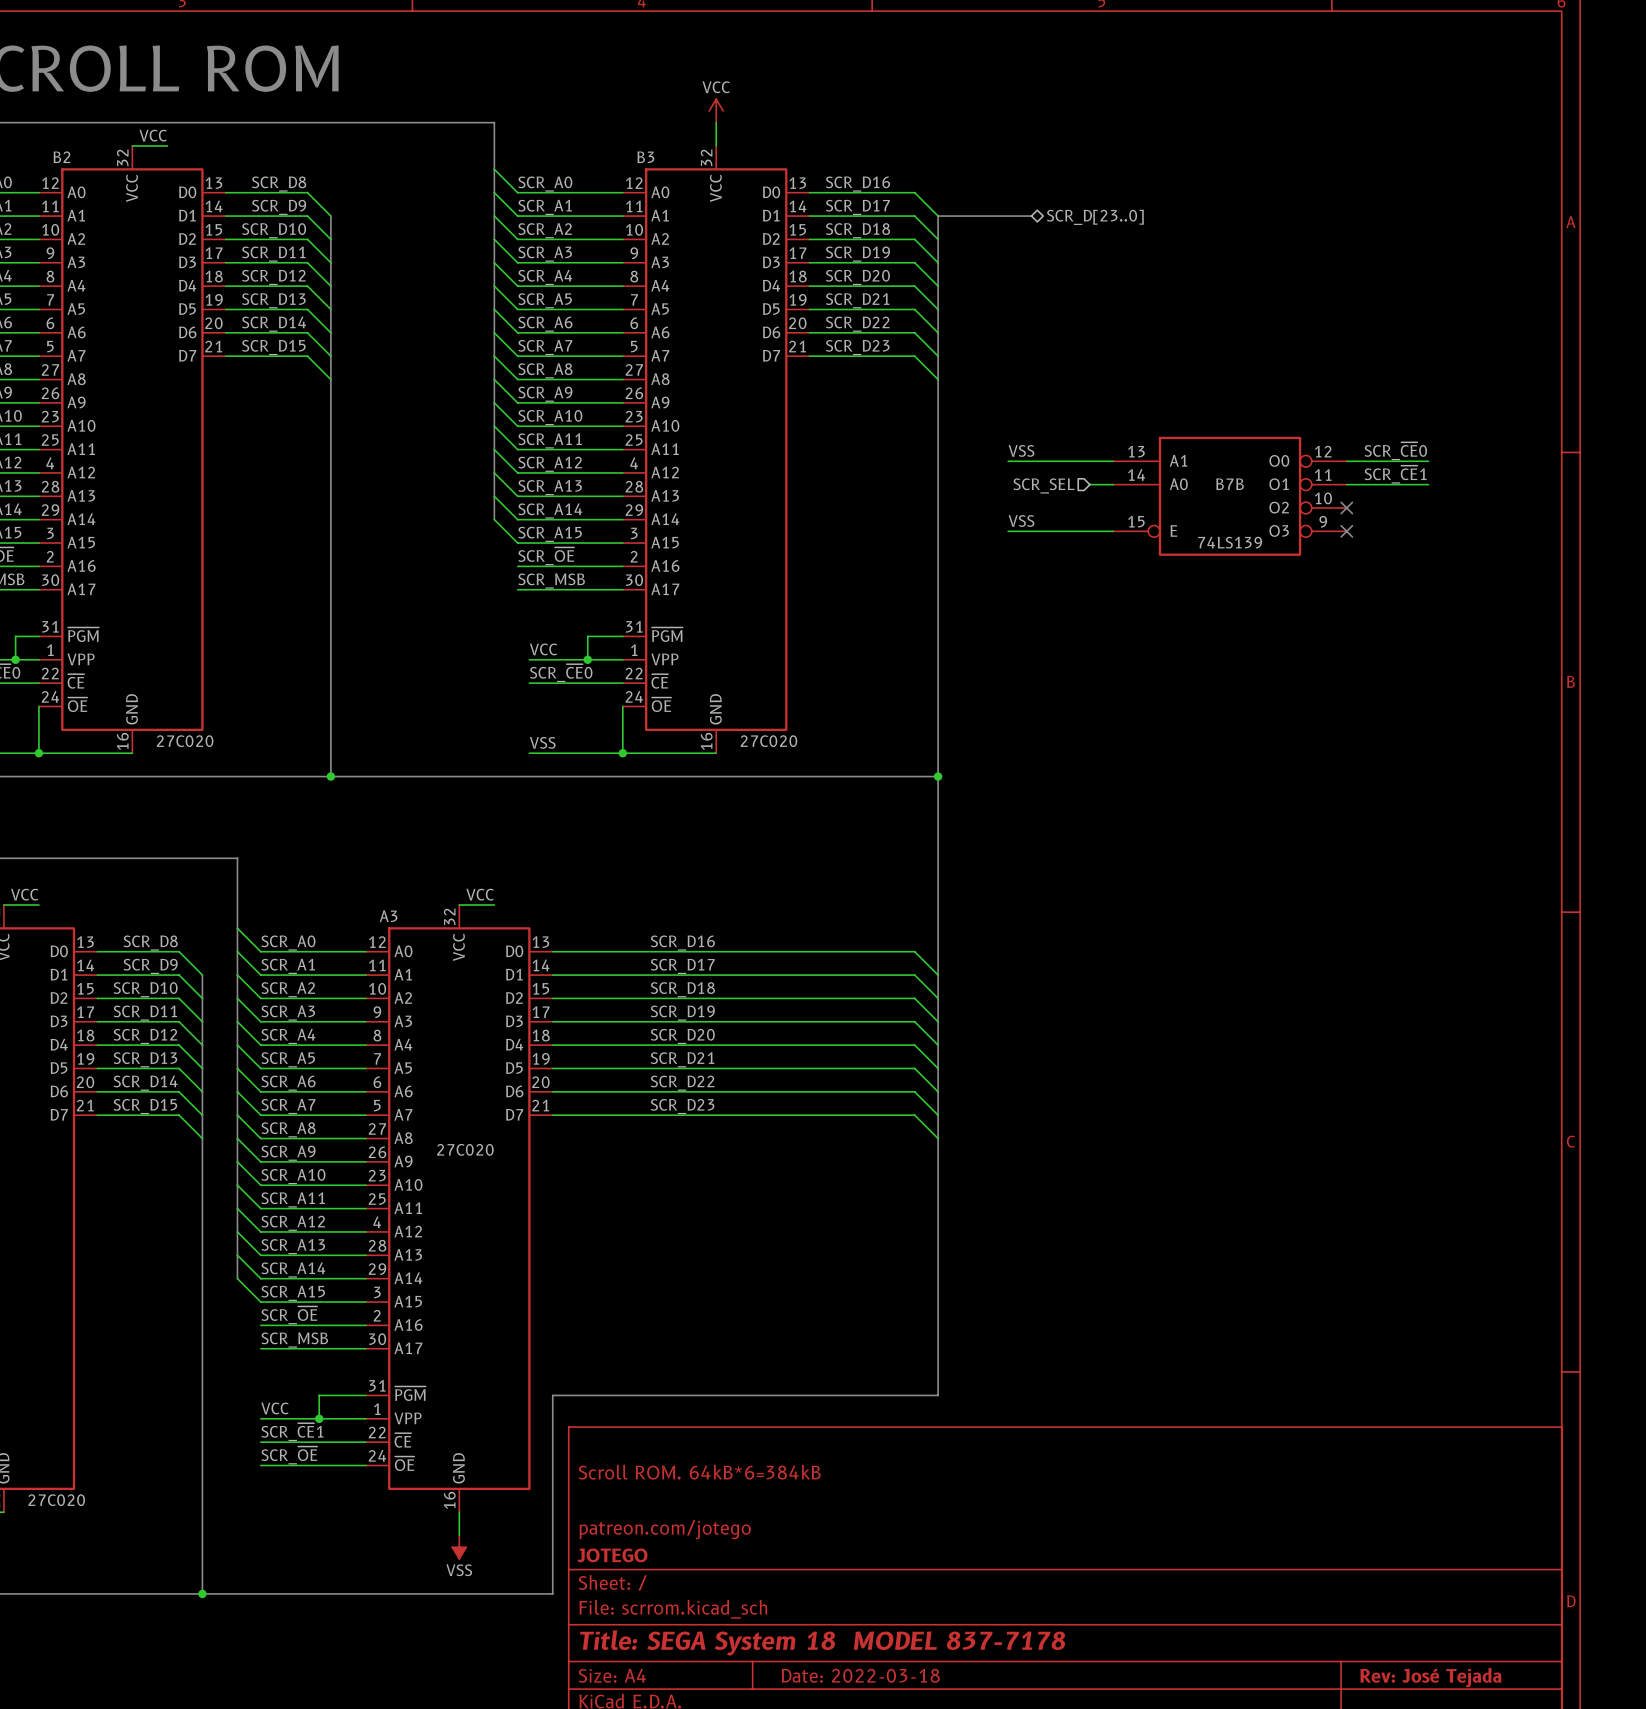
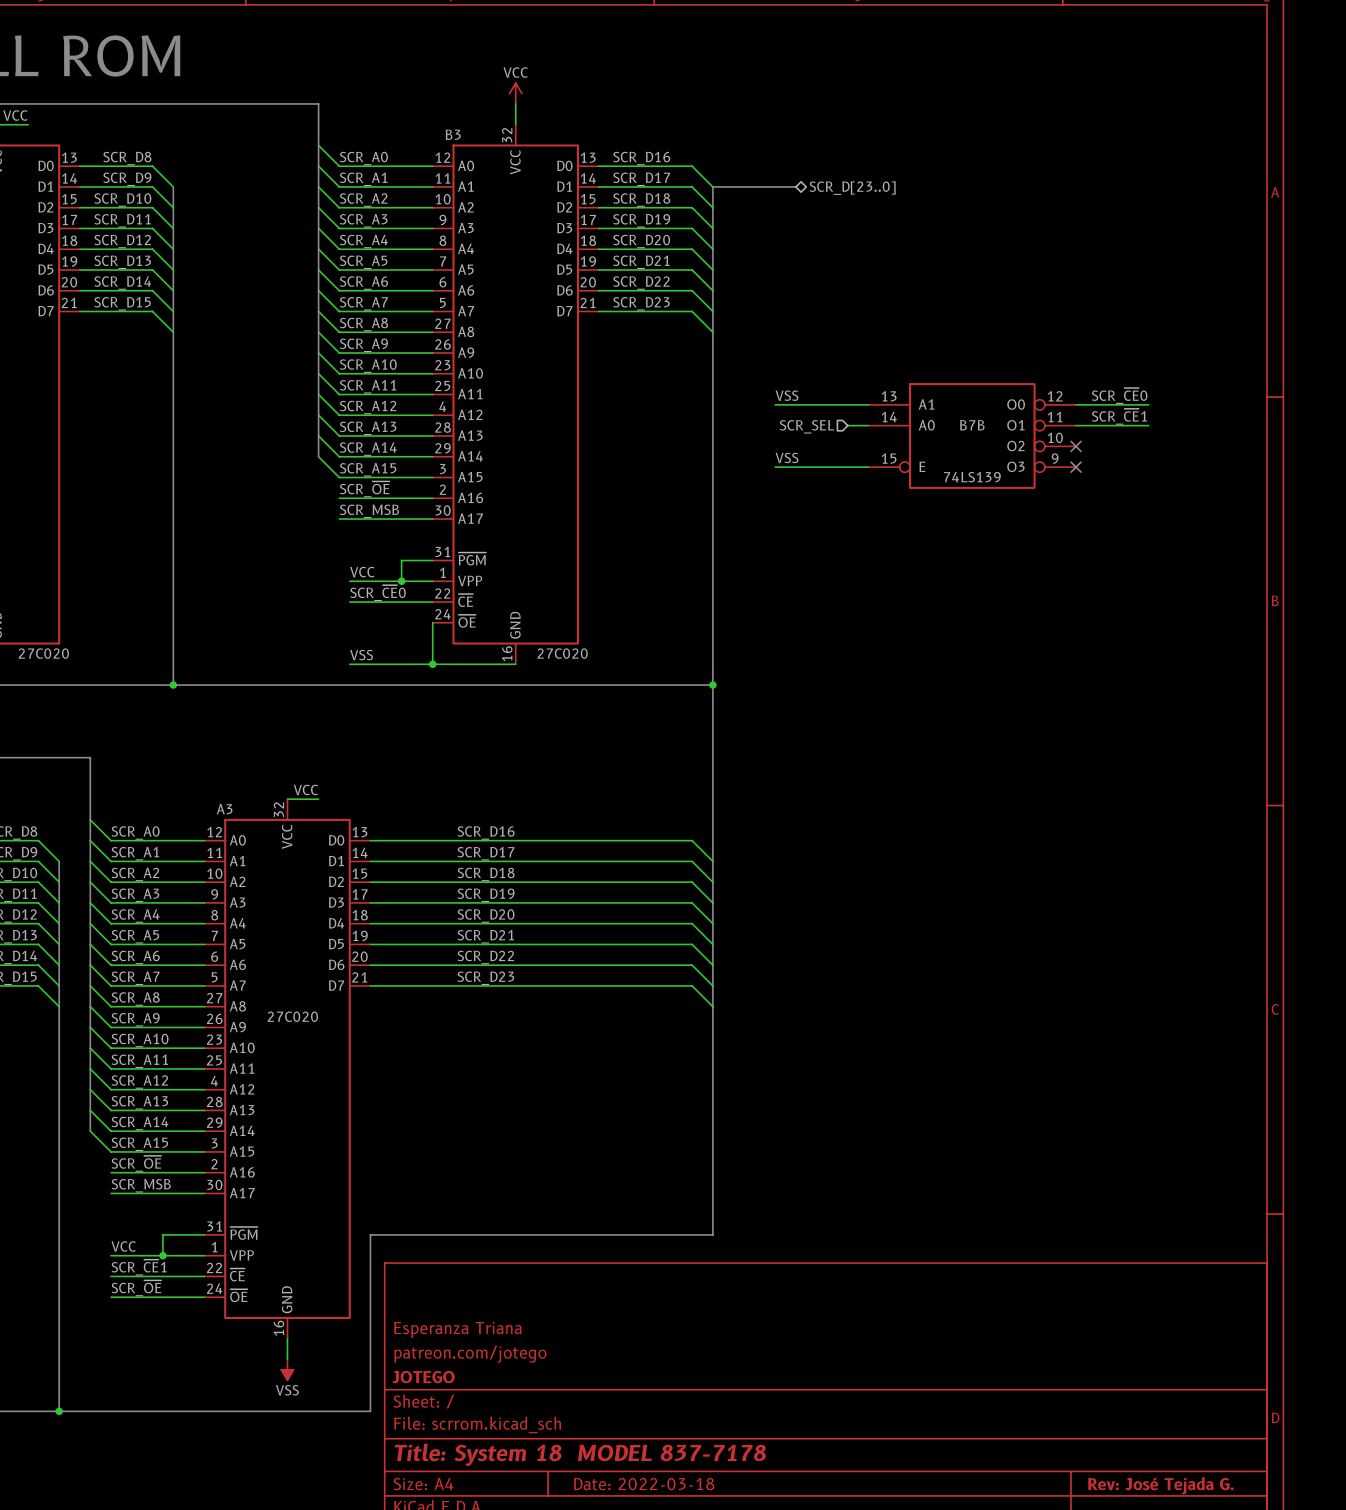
title block: Scroll ROM. 64kB*6=384kB (699, 1472) -> none
title block: none -> Esperanza Triana (457, 1330)
title block: Title: SEGA System 18 MODEL 837-7178 (822, 1642) -> Title: System 18 MODEL 837-7178 (580, 1454)
title block: Rev: José Tejada (1430, 1677) -> Rev: José Tejada G. (1160, 1485)

